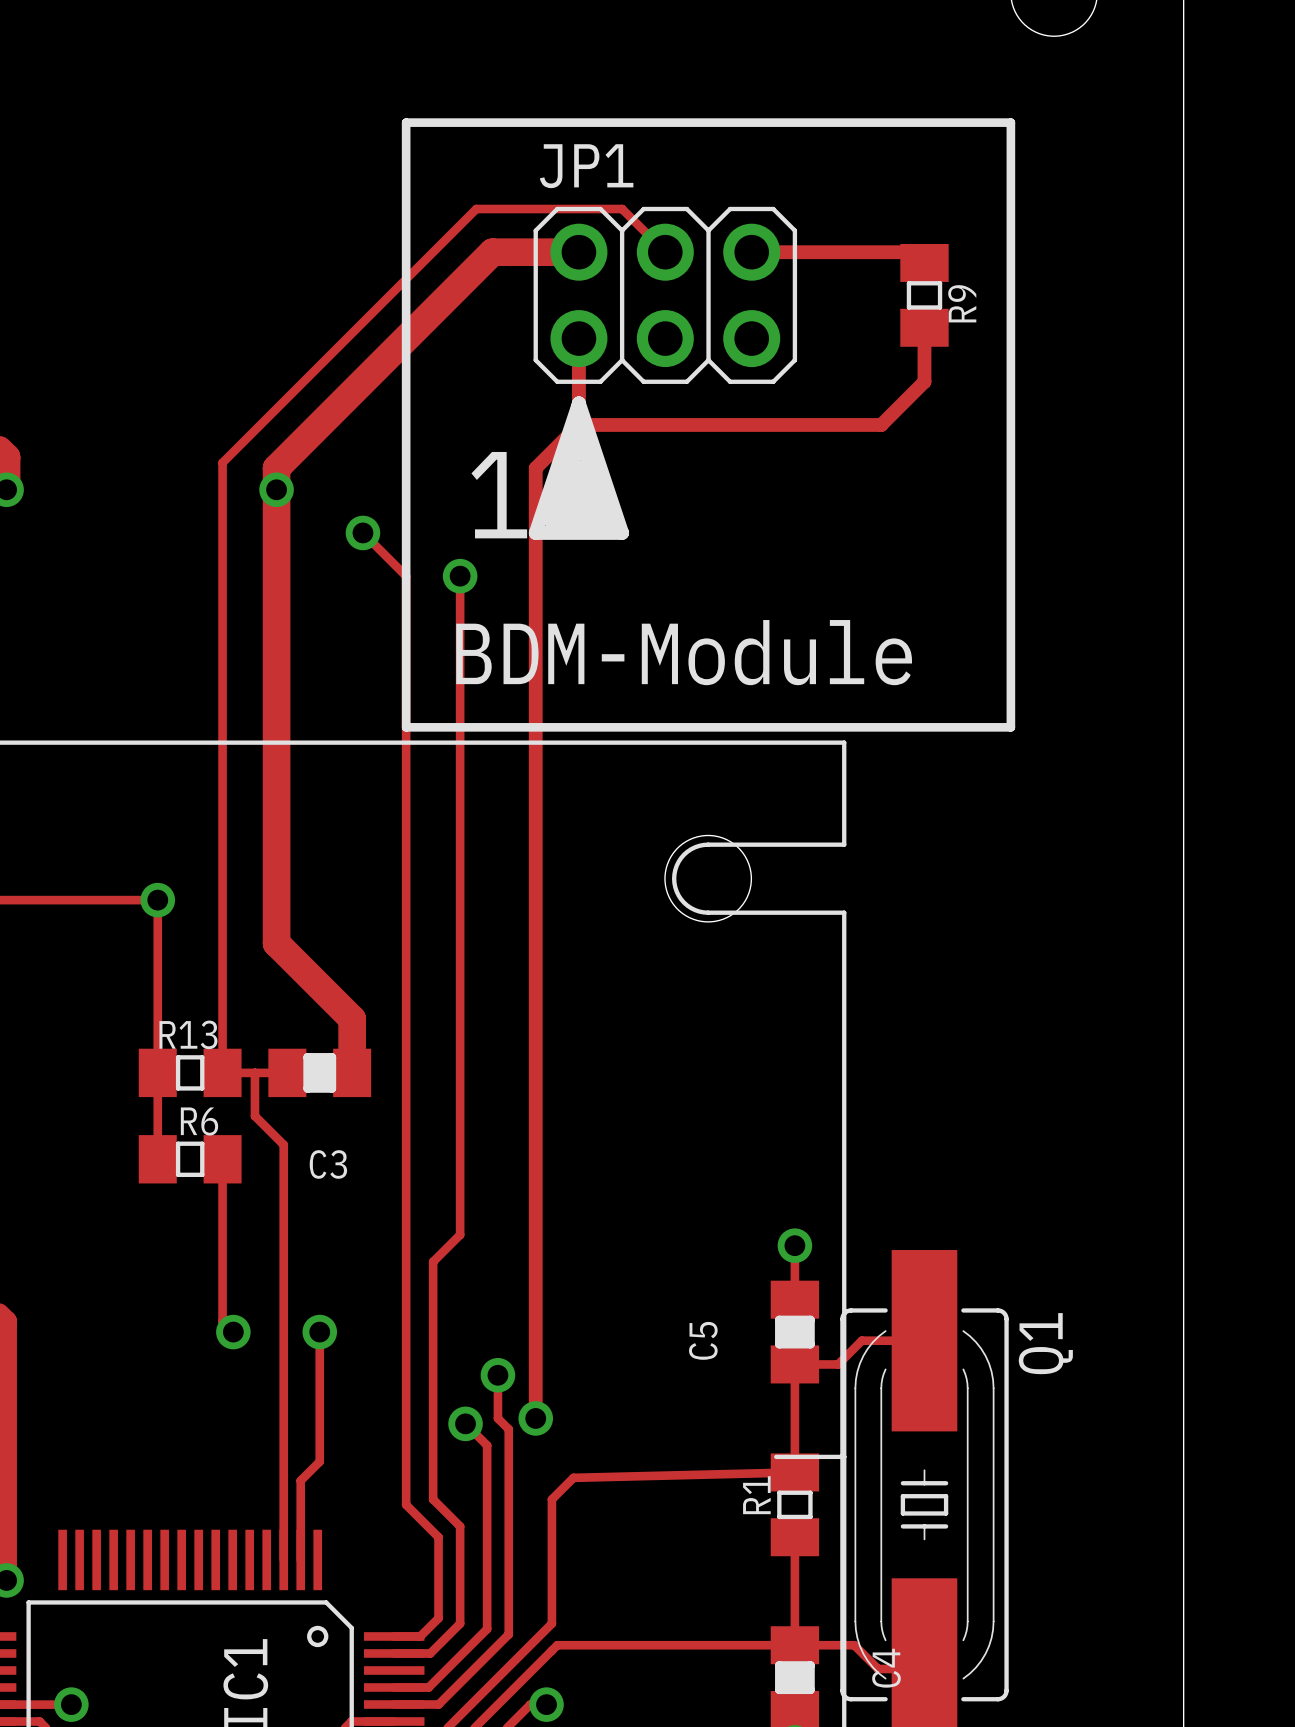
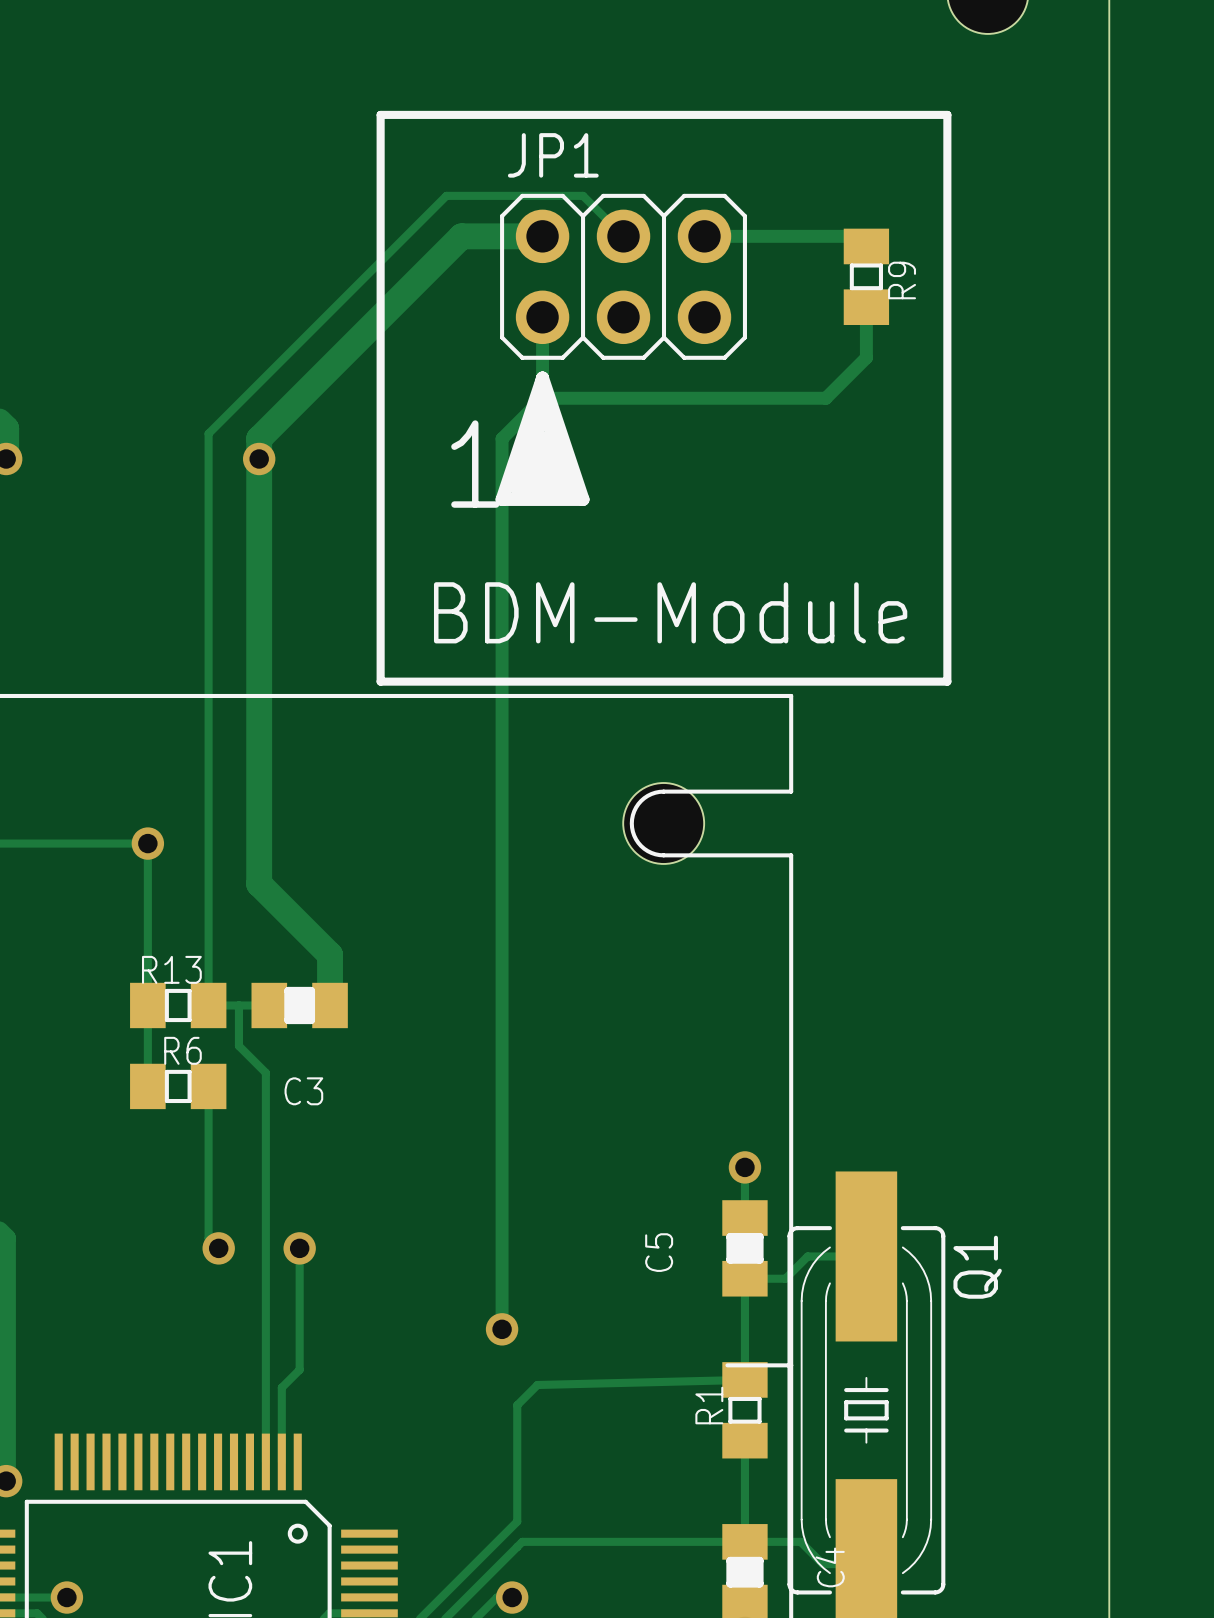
track: (362, 532) (406, 576) (406, 1504) (438, 1537) (438, 1618) (420, 1636) (394, 1636) -> none
via: (362, 532) -> none
track: (460, 576) (460, 1234) (433, 1261) (433, 1499) (460, 1526) (460, 1623) (430, 1653) (394, 1653) -> none
via: (460, 576) -> none
track: (497, 1375) (497, 1418) (508, 1429) (508, 1634) (438, 1704) (394, 1704) -> none
via: (497, 1375) -> none
track: (465, 1423) (487, 1445) (487, 1629) (428, 1687) (394, 1687) -> none
via: (465, 1423) -> none

